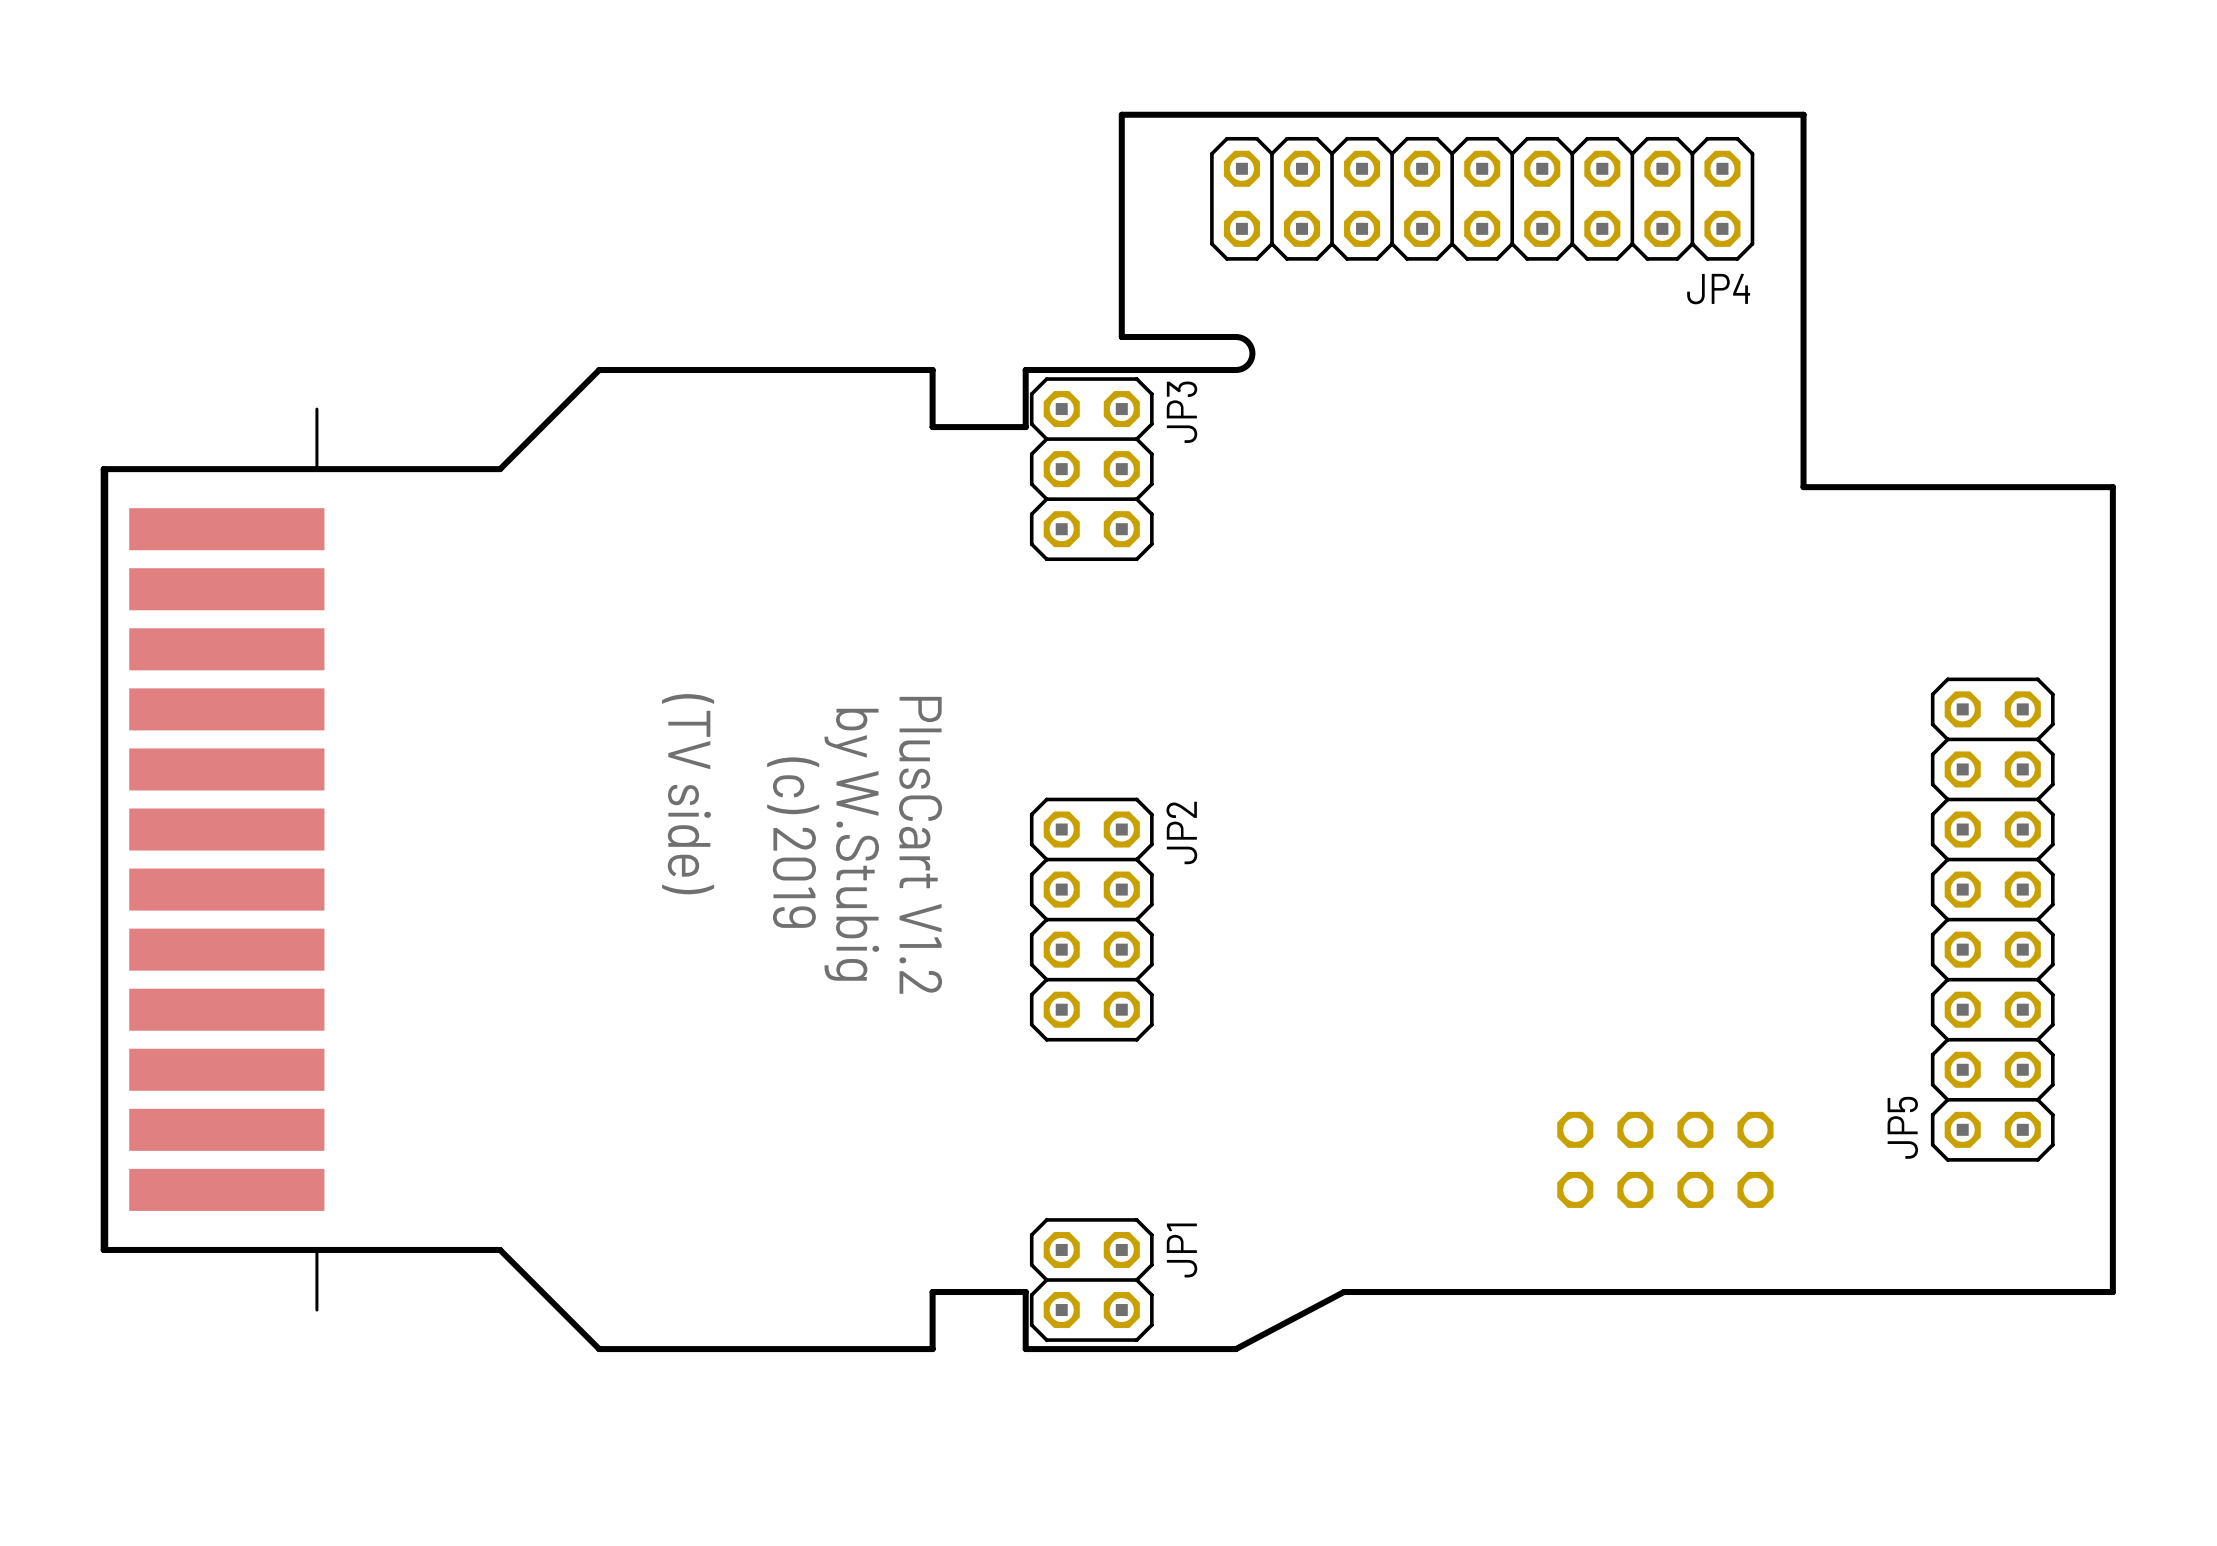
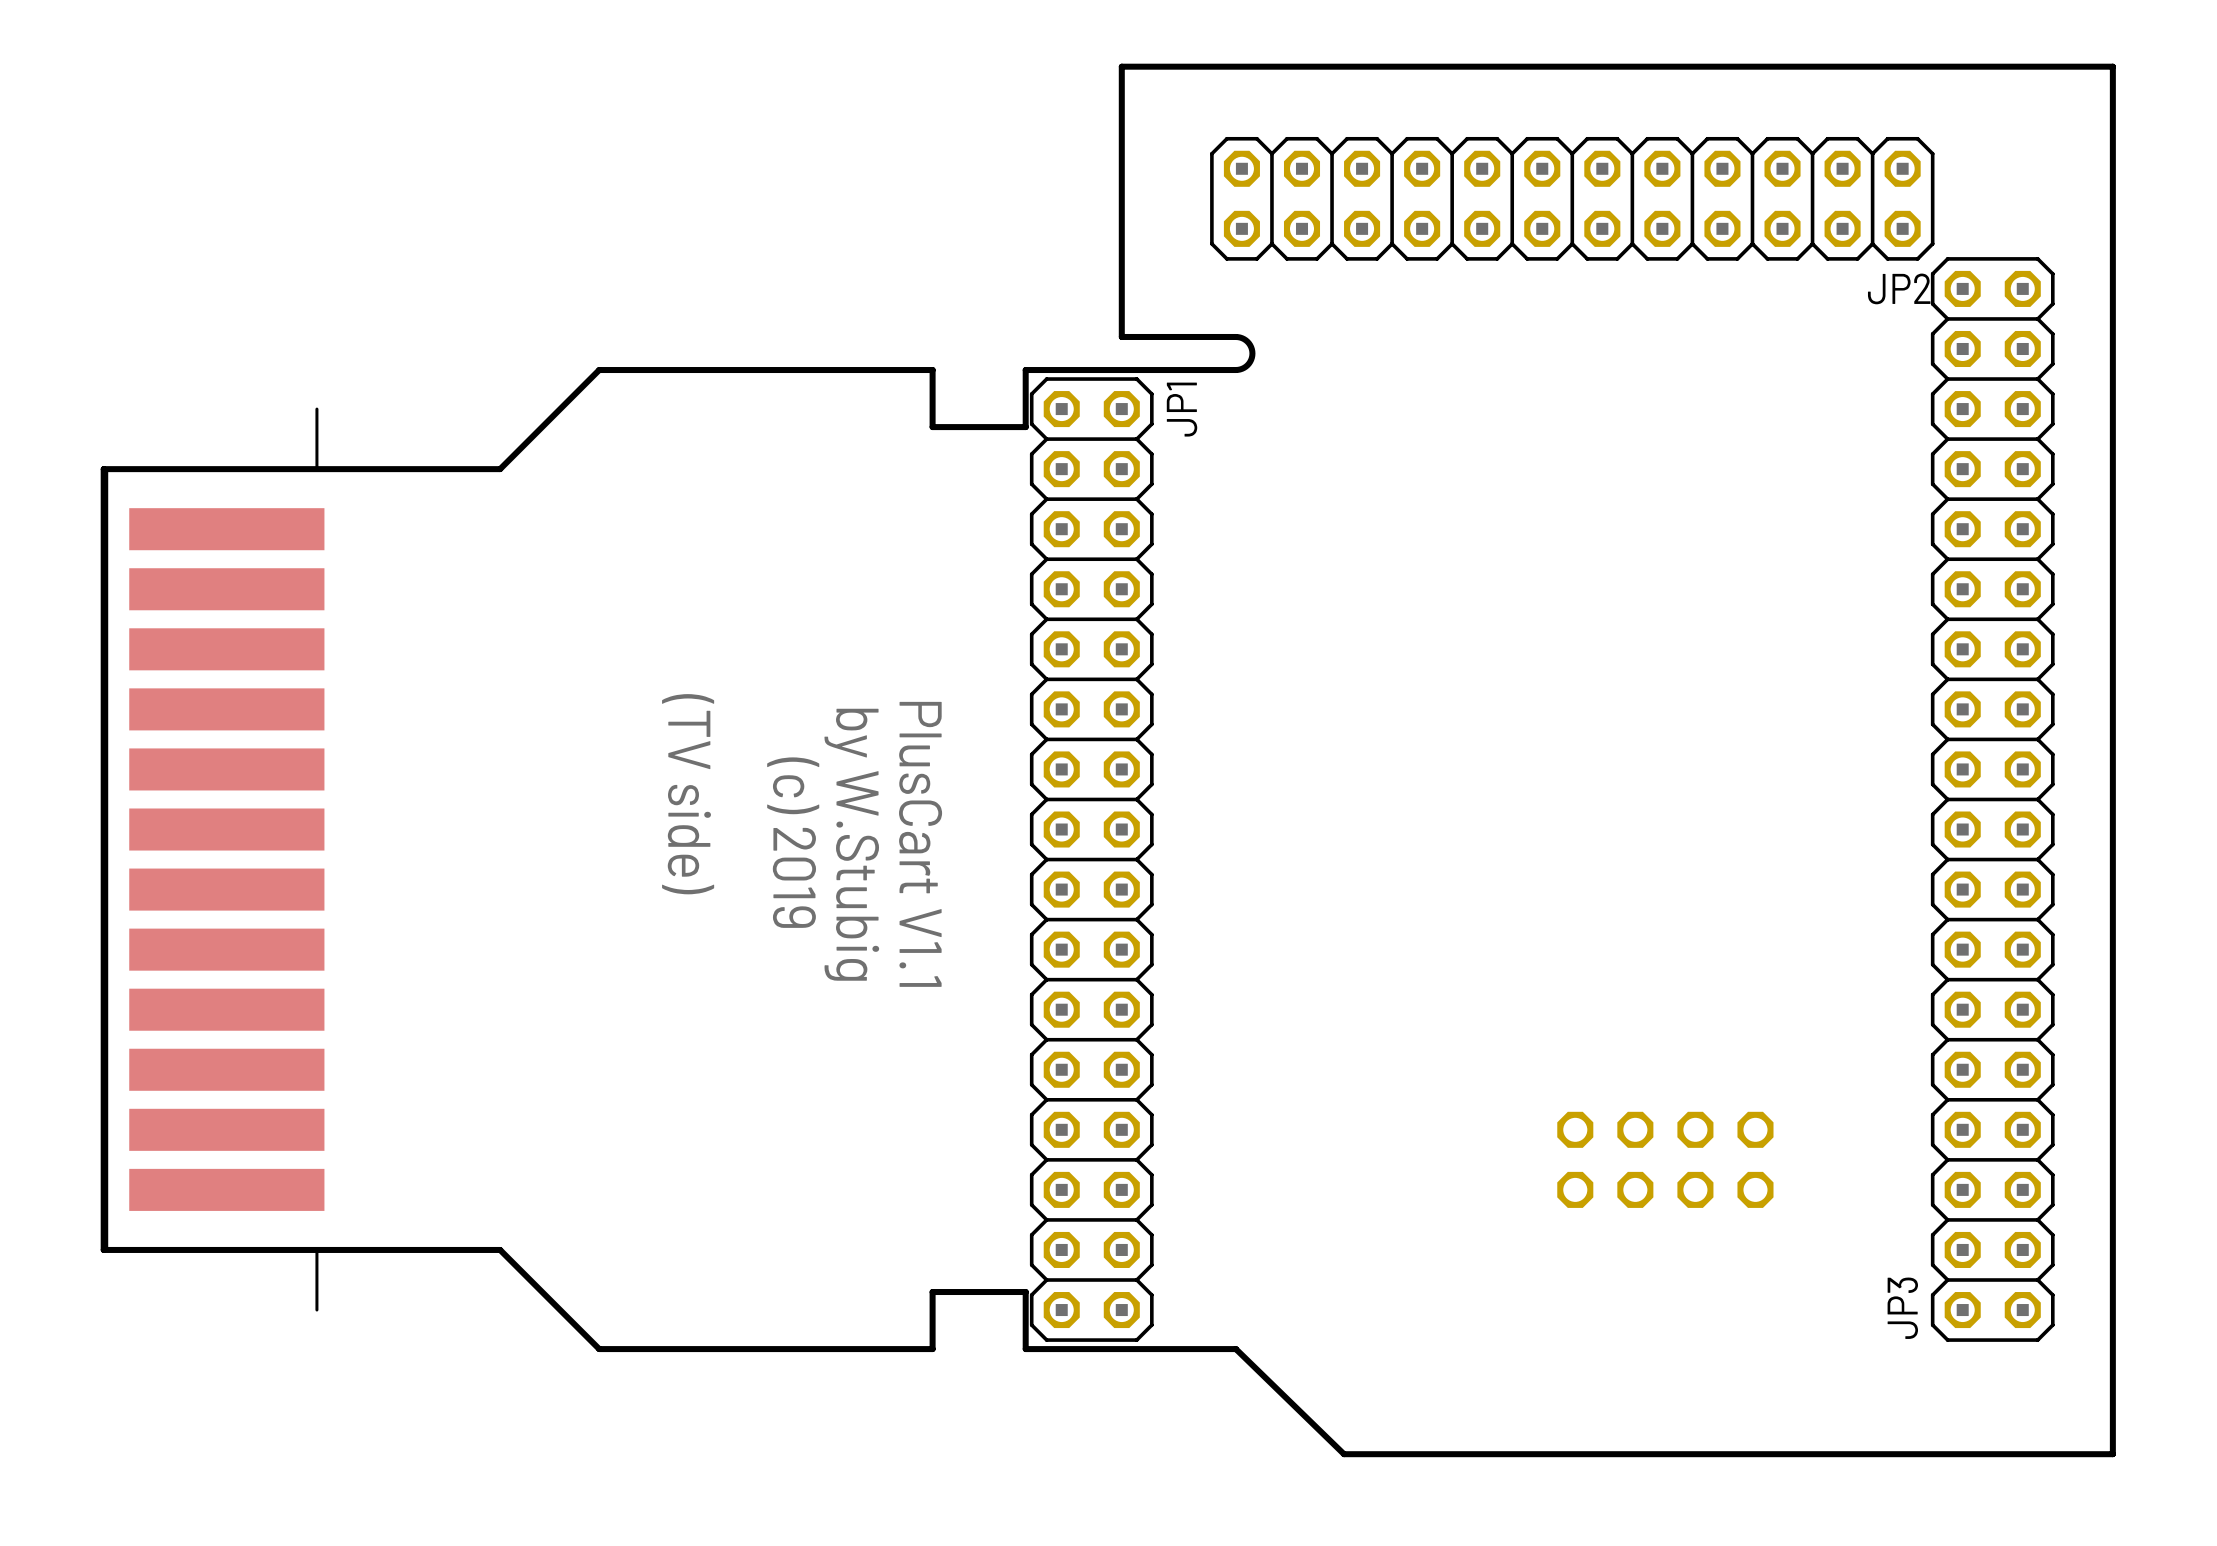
board edge: (1121, 114) (1803, 114) (1803, 487) (2112, 487) -> (1121, 114) (1121, 66) (2112, 66) (2112, 487)
JP4: (1482, 198) -> none
JP3 footprint: [1029, 377, 1154, 562] -> [1930, 257, 2055, 1342]
JP3 name position: JP3 (1182, 412) -> JP3 (1902, 1308)
JP2 footprint: [1029, 797, 1154, 1042] -> [1210, 136, 1935, 261]
JP2 name position: JP2 (1181, 832) -> JP2 (1899, 288)
text: PlusCart V1.2 (920, 845) -> PlusCart V1.1 (920, 844)
JP5: (1992, 919) -> none
JP1 footprint: [1029, 1218, 1154, 1342] -> [1029, 377, 1154, 1342]
JP1 name position: JP1 (1182, 1250) -> JP1 (1182, 409)
board edge: (2112, 1292) (1344, 1292) (1235, 1349) -> (2112, 1292) (2112, 1454) (1344, 1454) (1235, 1349)

